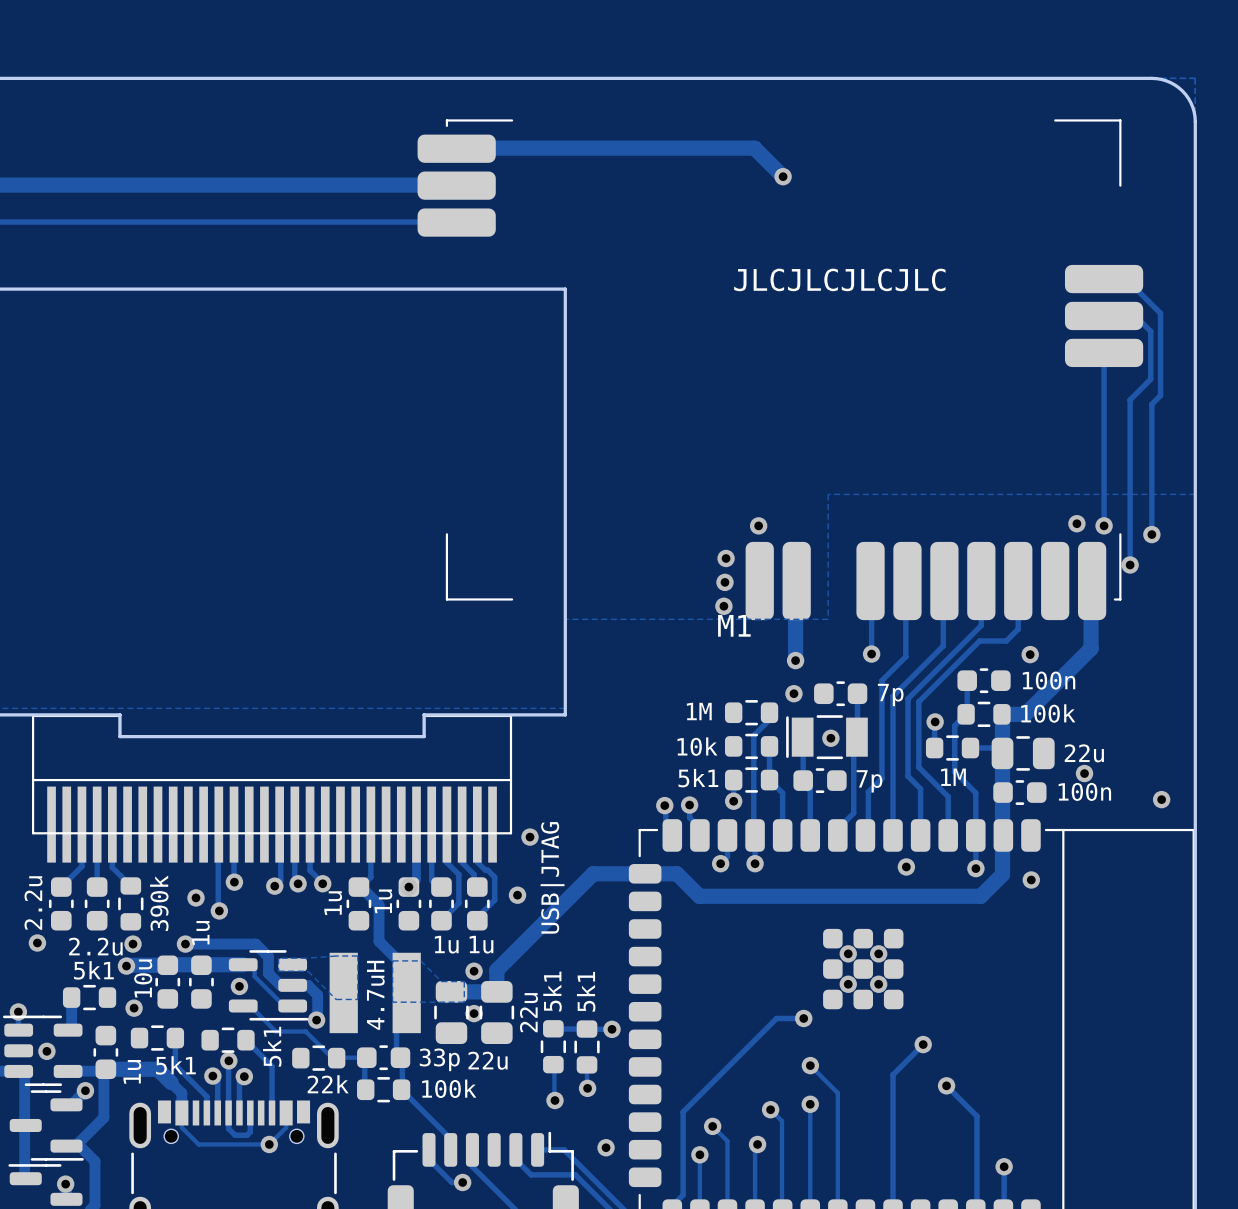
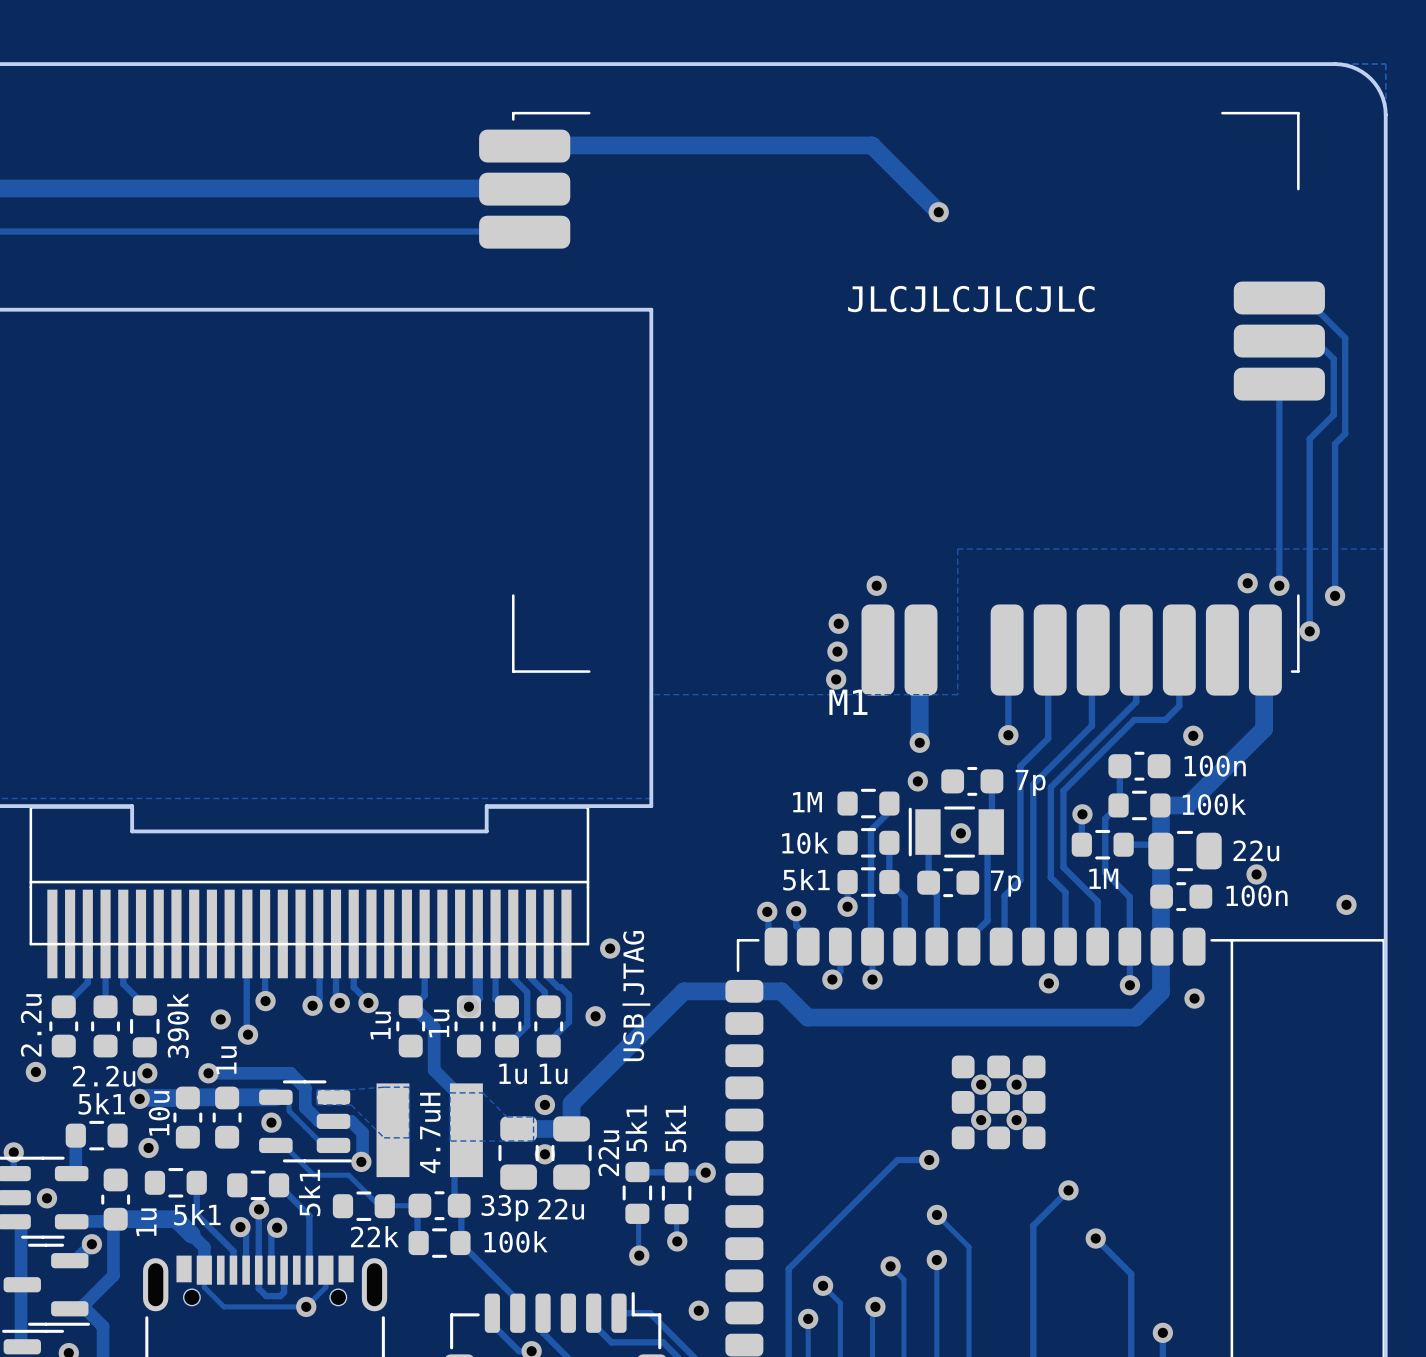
track: none -> (905, 178) (938, 212)
via position: (783, 176) -> (938, 212)

